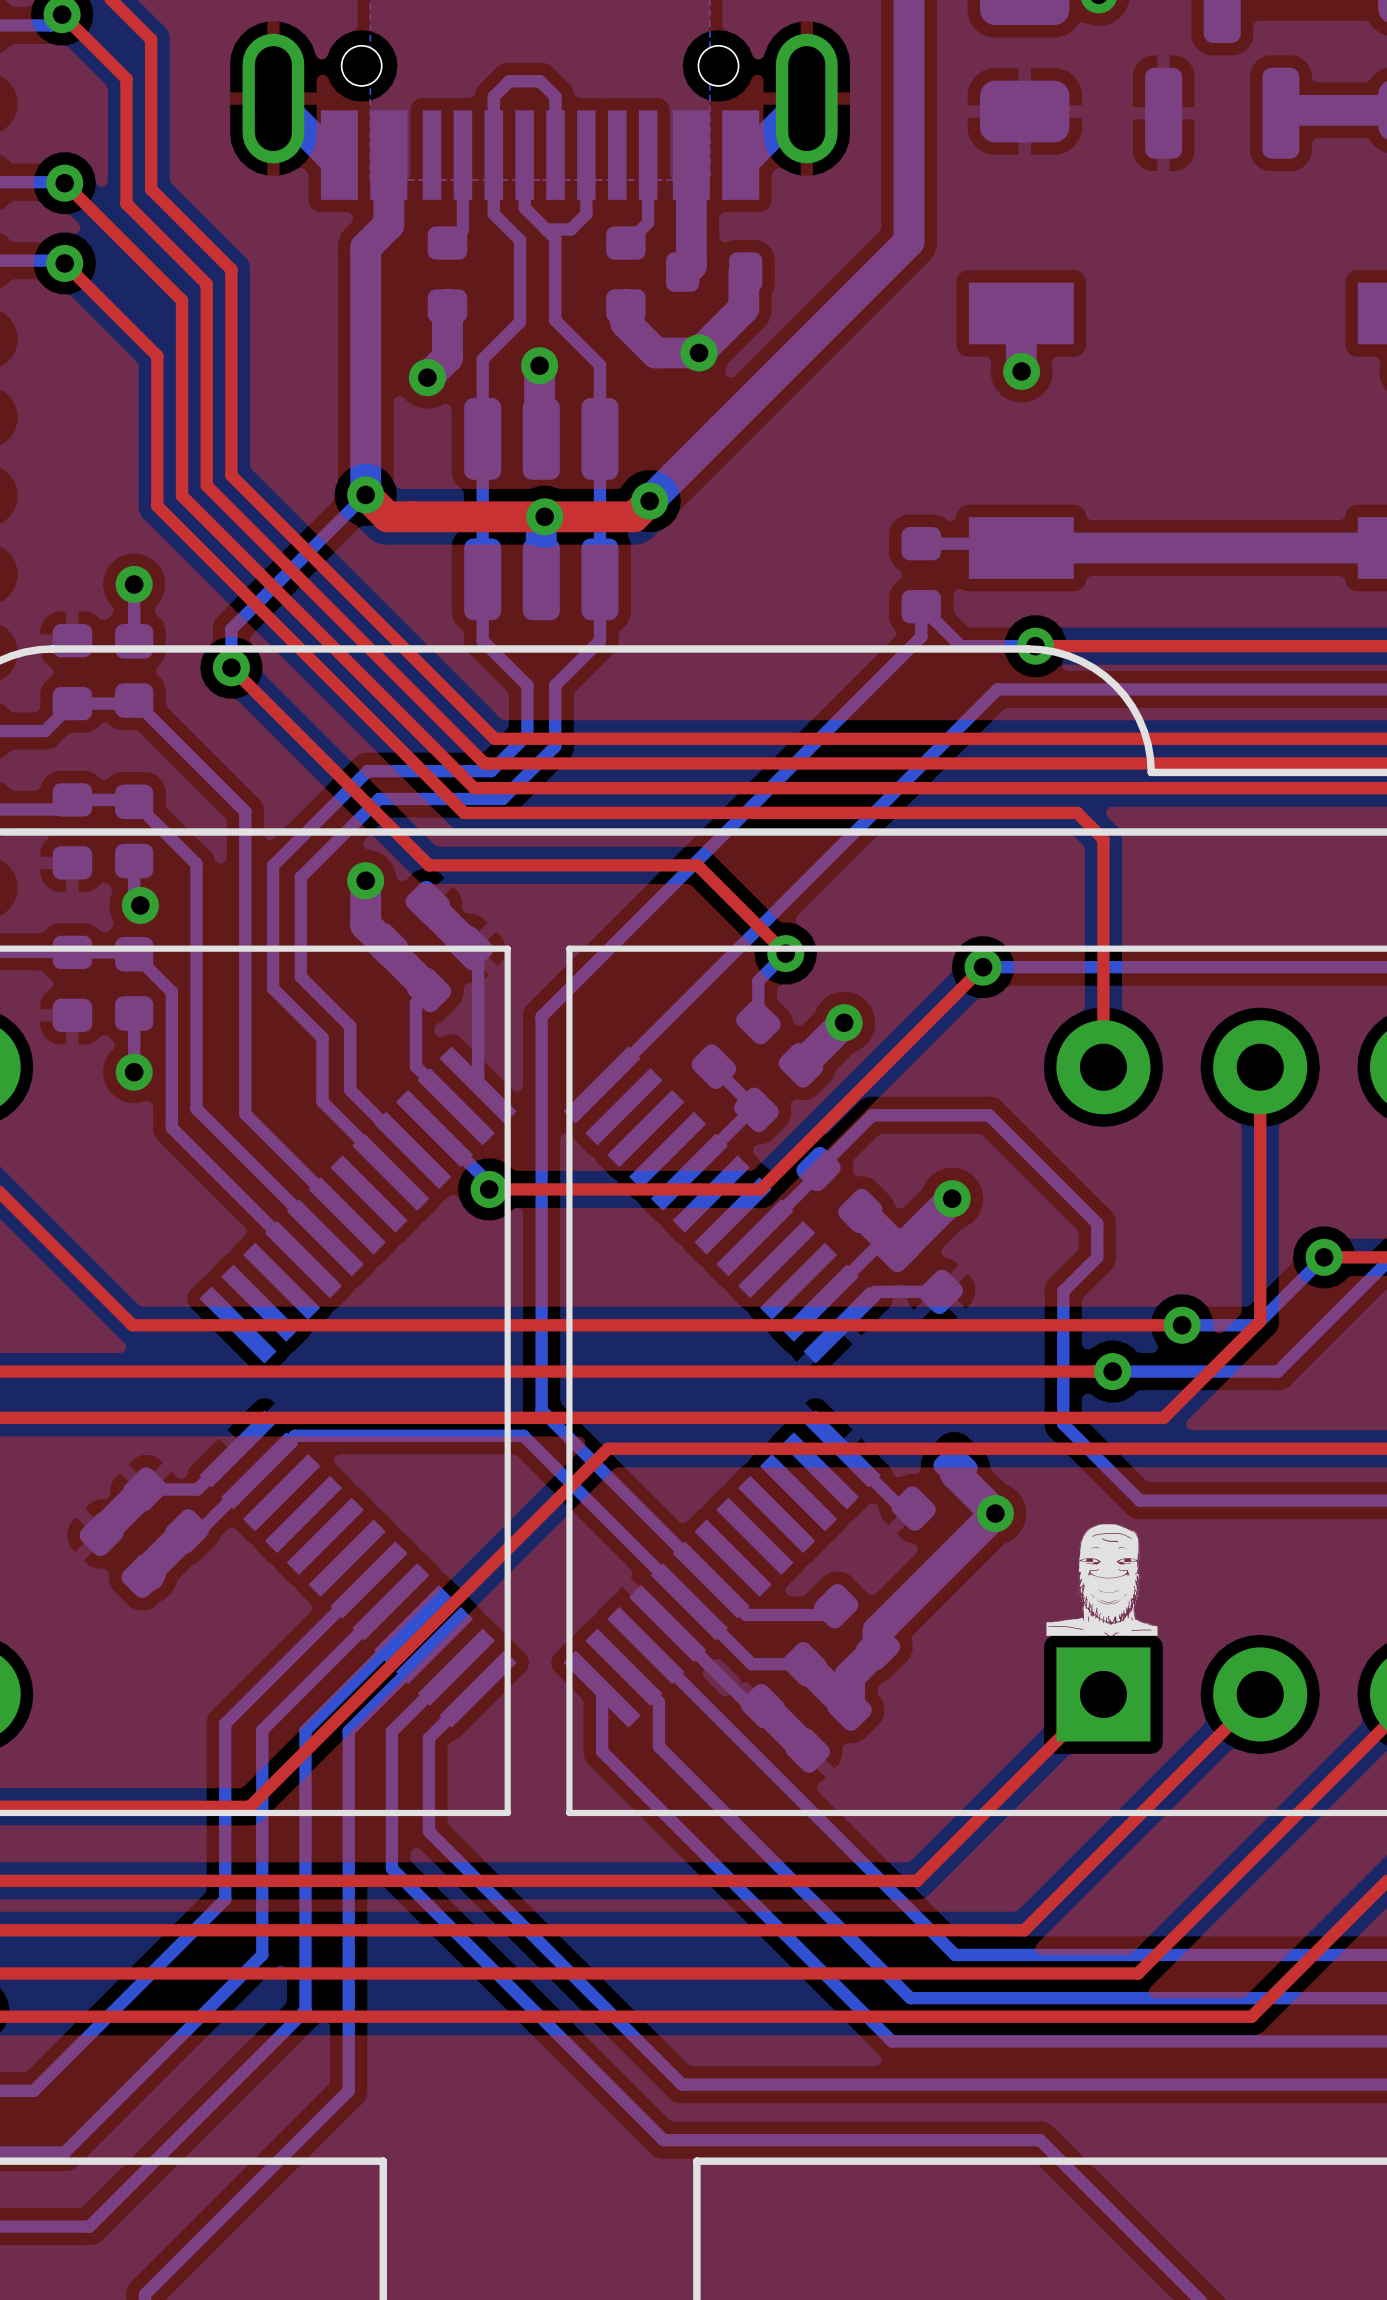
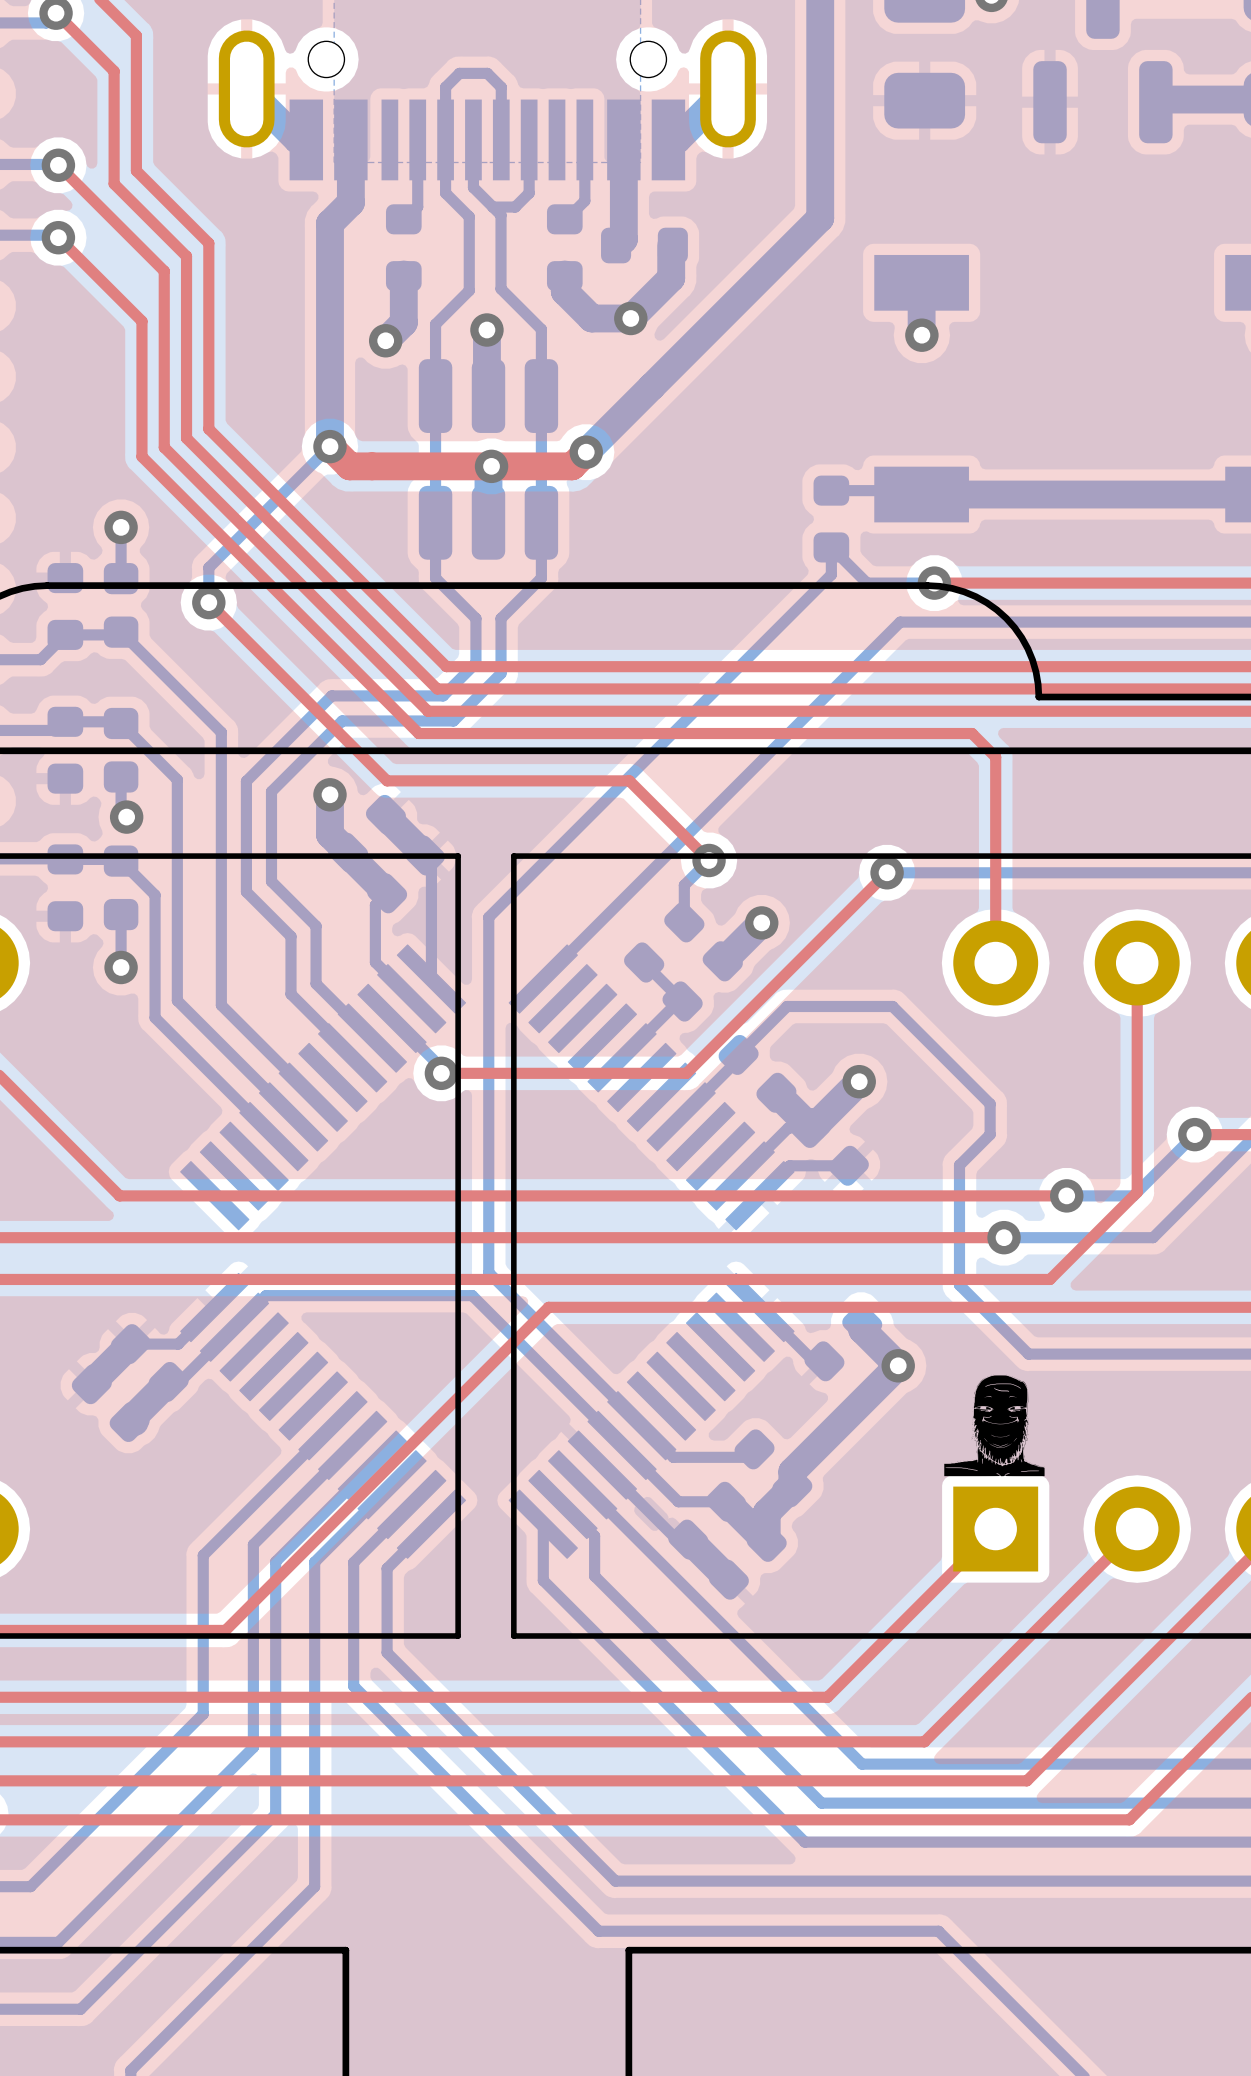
bottom track: (280, 1711) (262, 1730) (262, 1954) -> (253, 1544) (253, 1747) (236, 1764)

